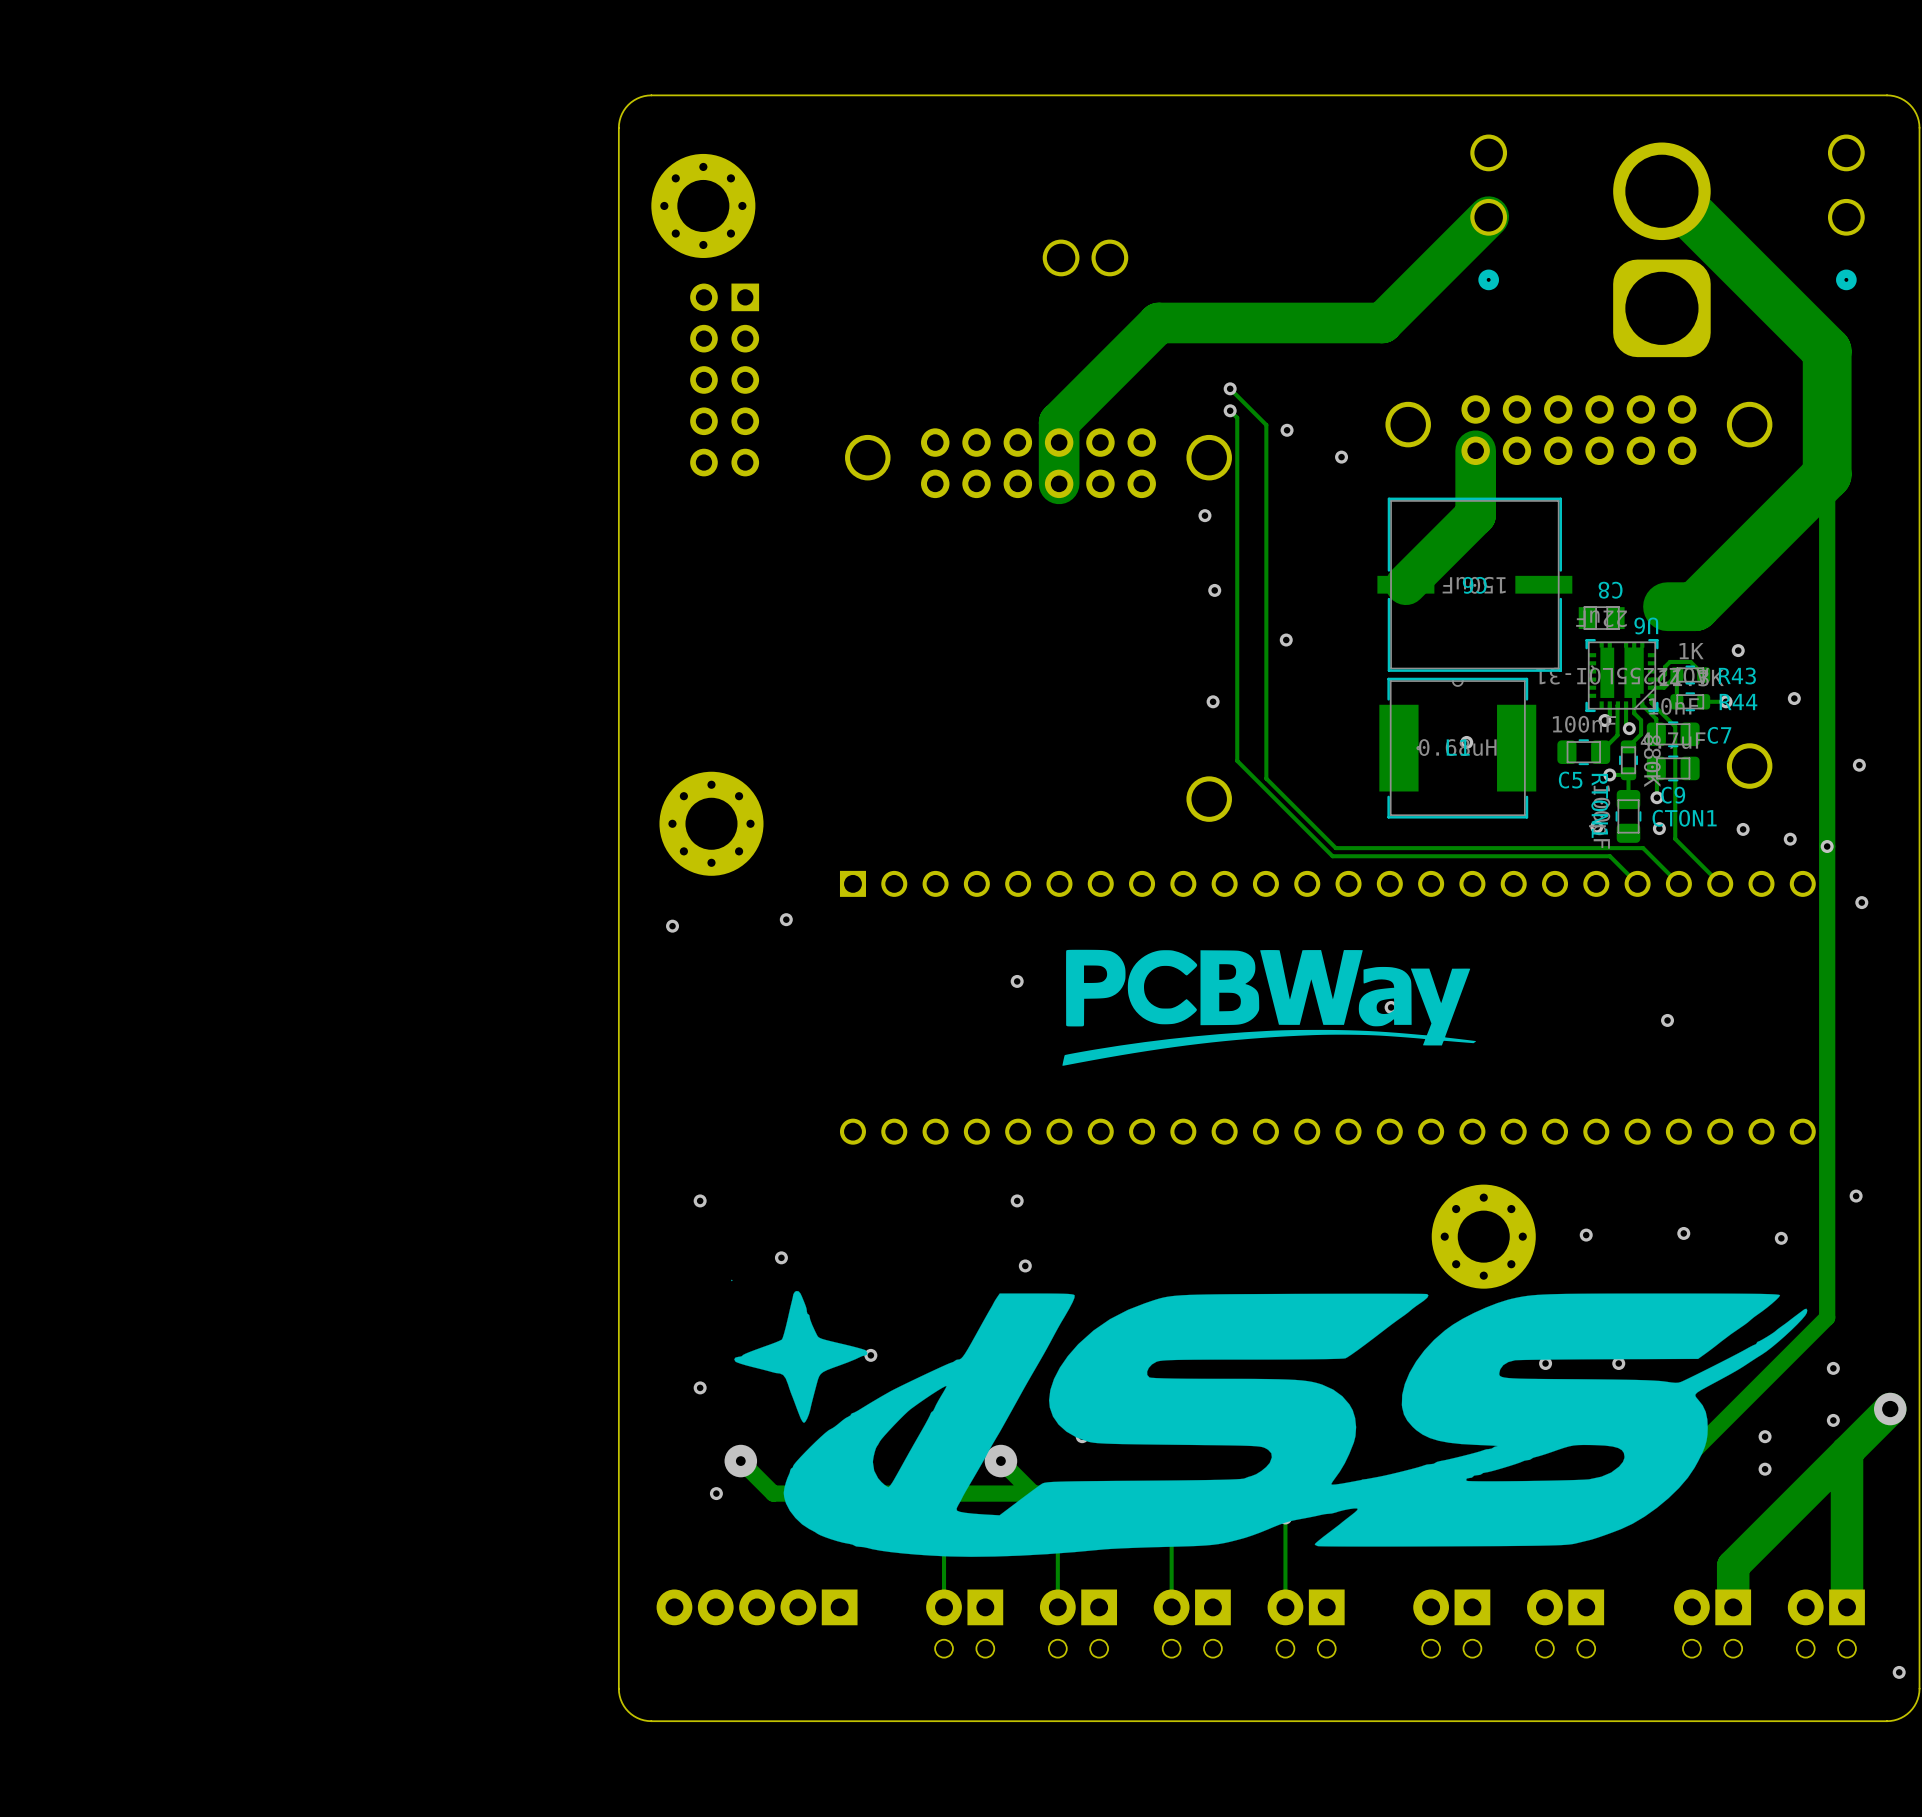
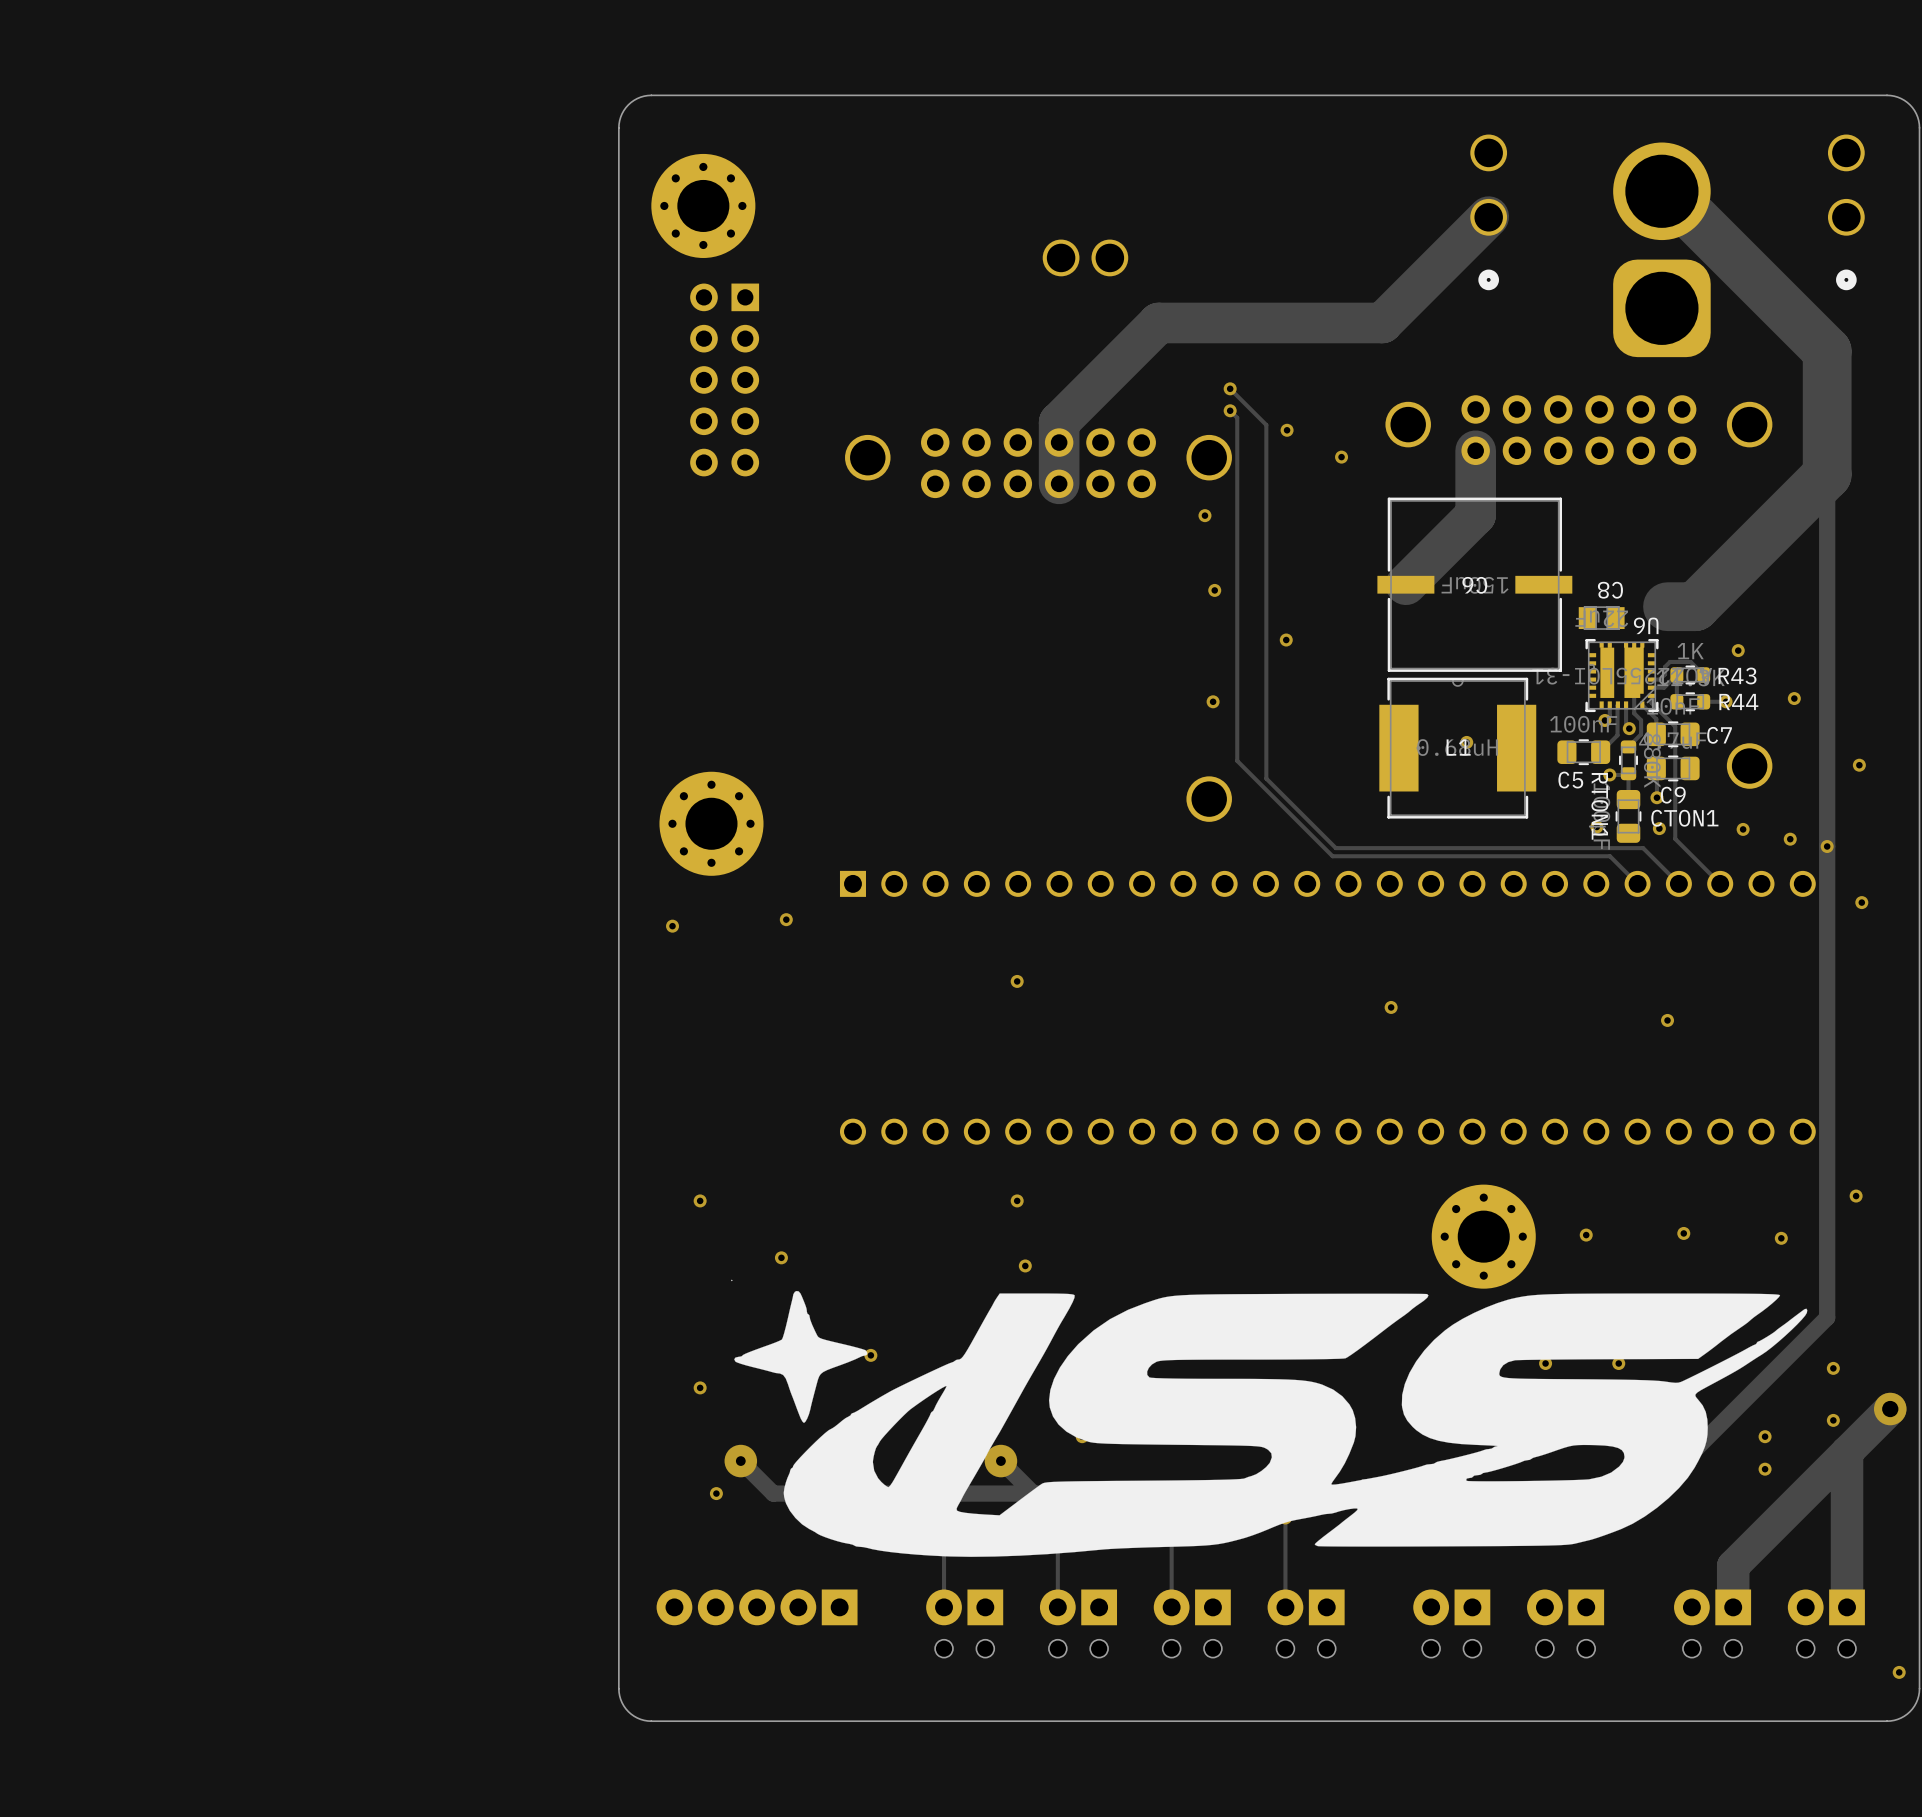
drawing: [1062, 949, 1476, 1066] -> none

